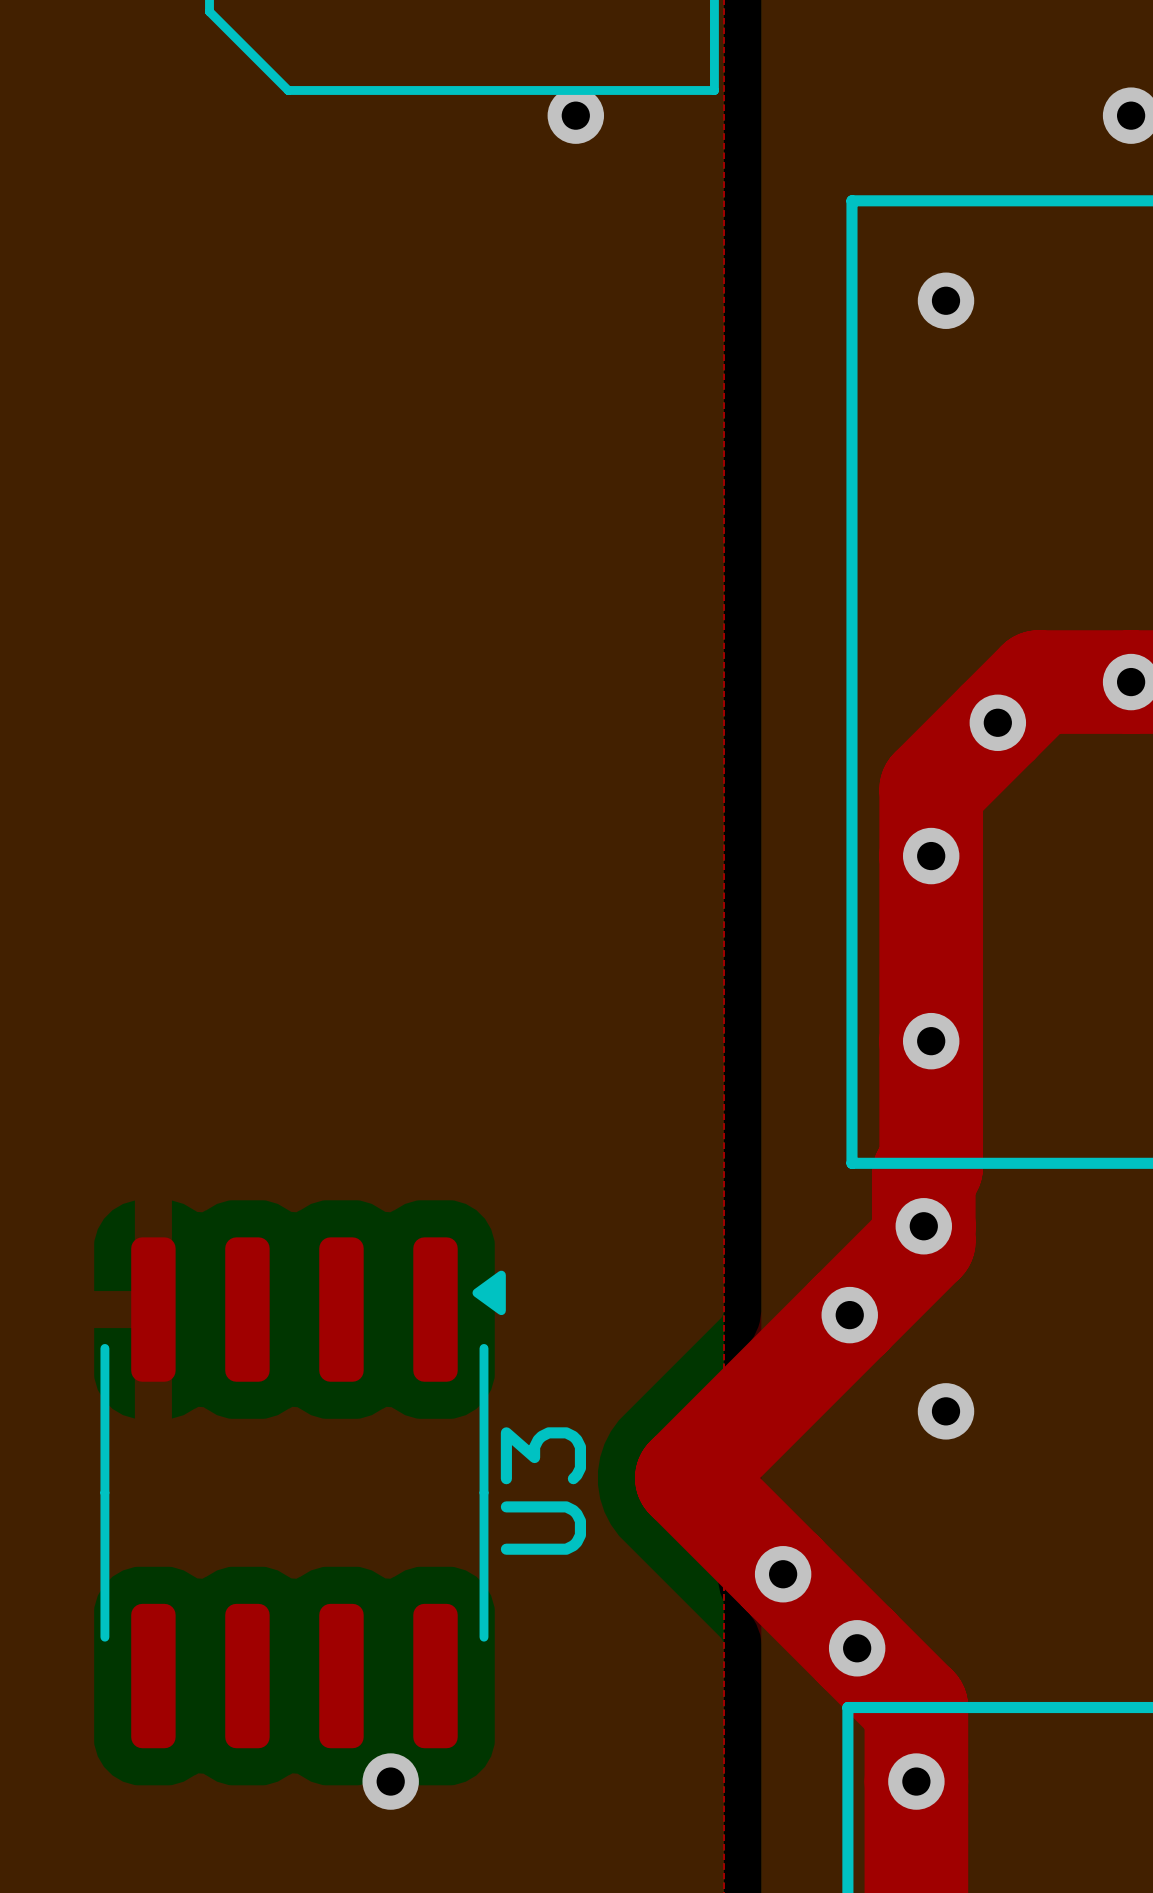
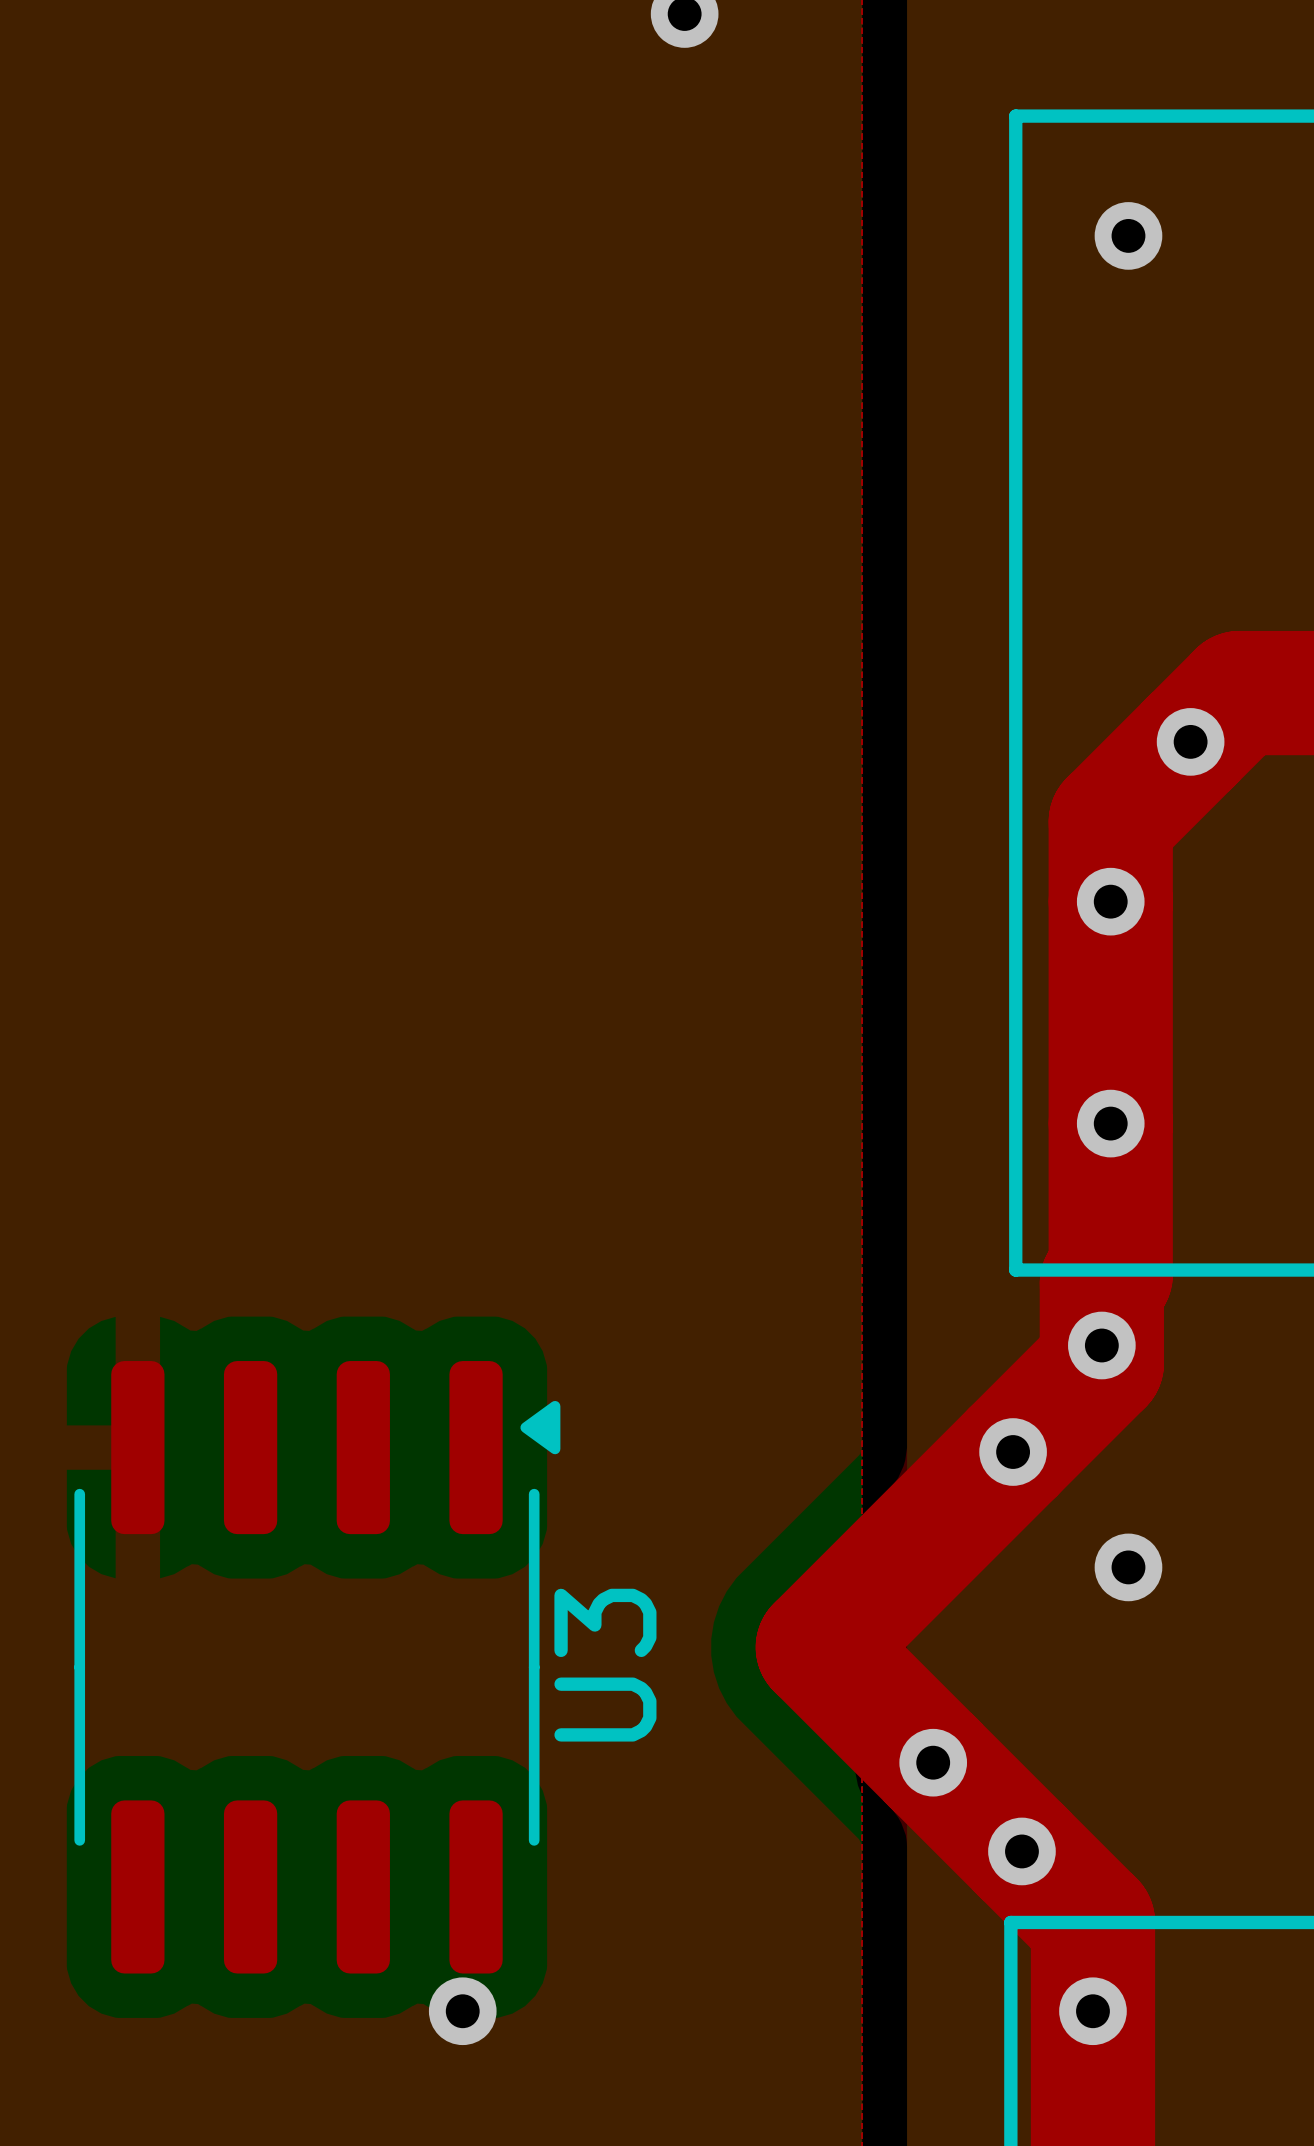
U3 position: (303, 1492) -> (317, 1667)

